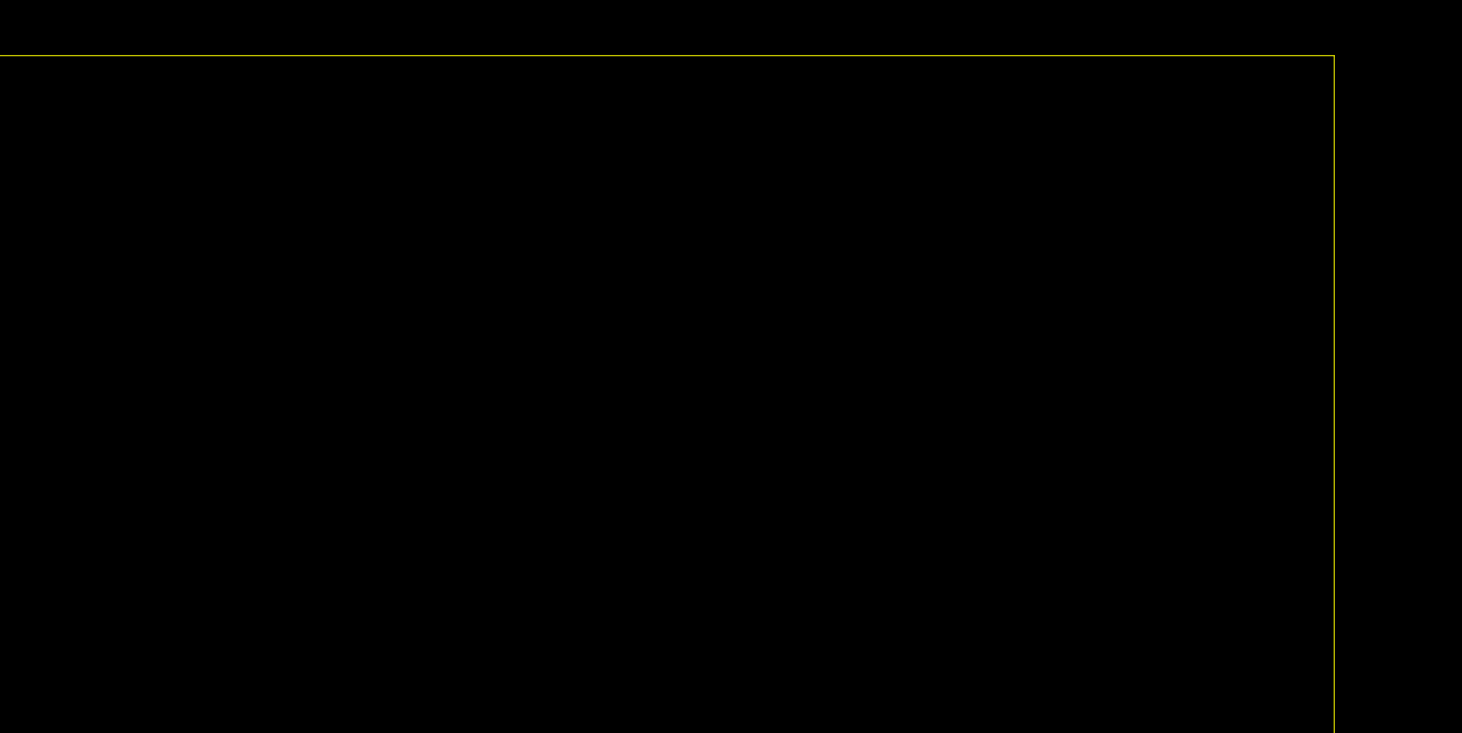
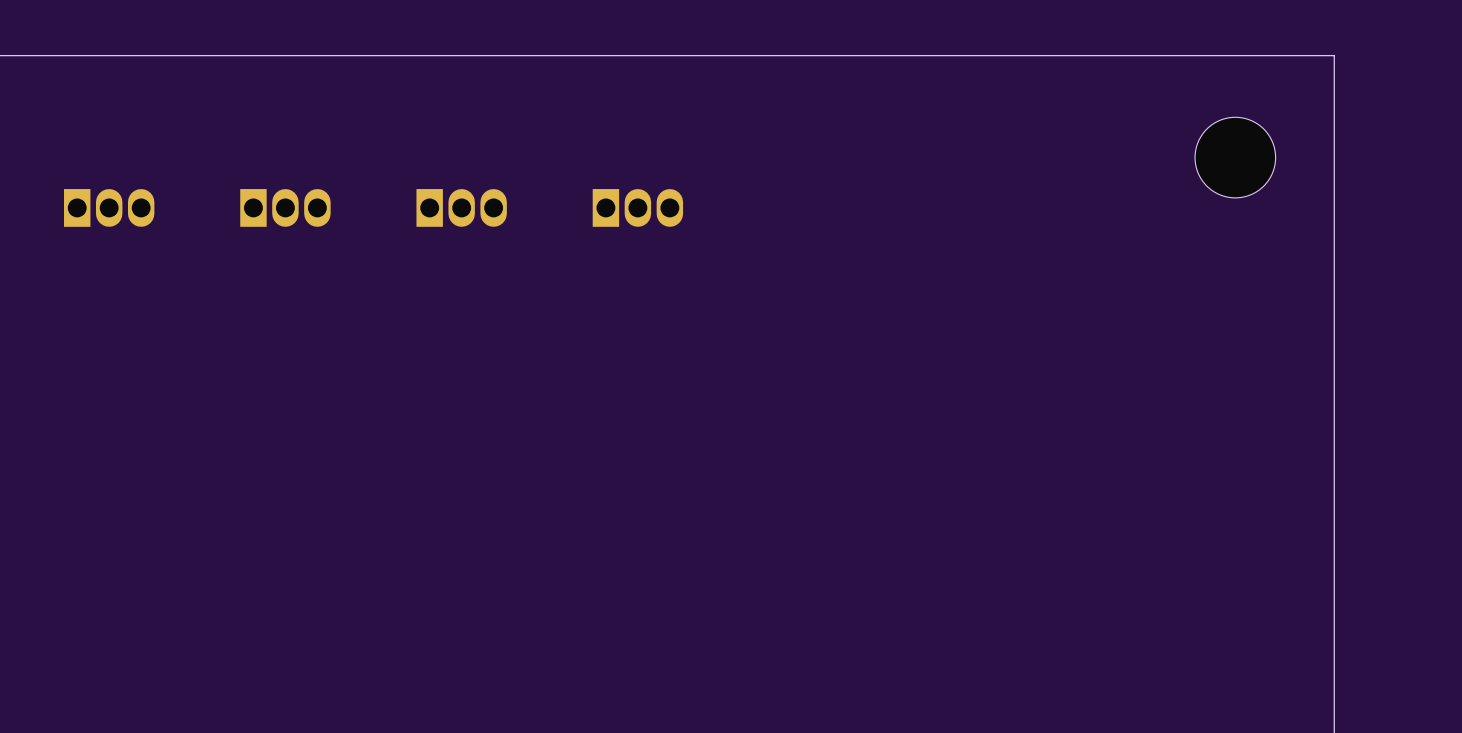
part: none -> (1235, 157)
part: none -> (109, 207)
part: none -> (285, 207)
part: none -> (461, 207)
part: none -> (637, 207)

